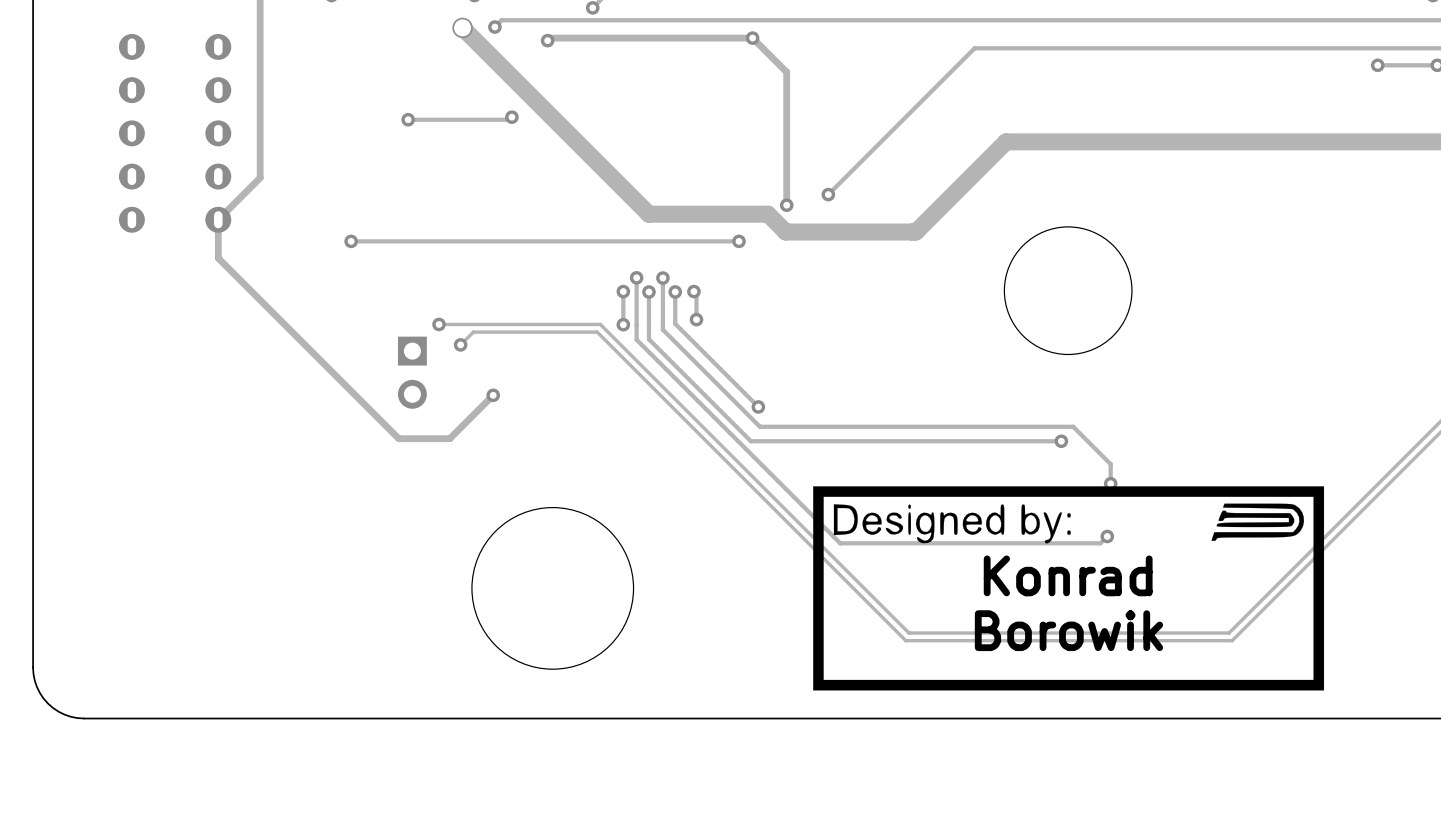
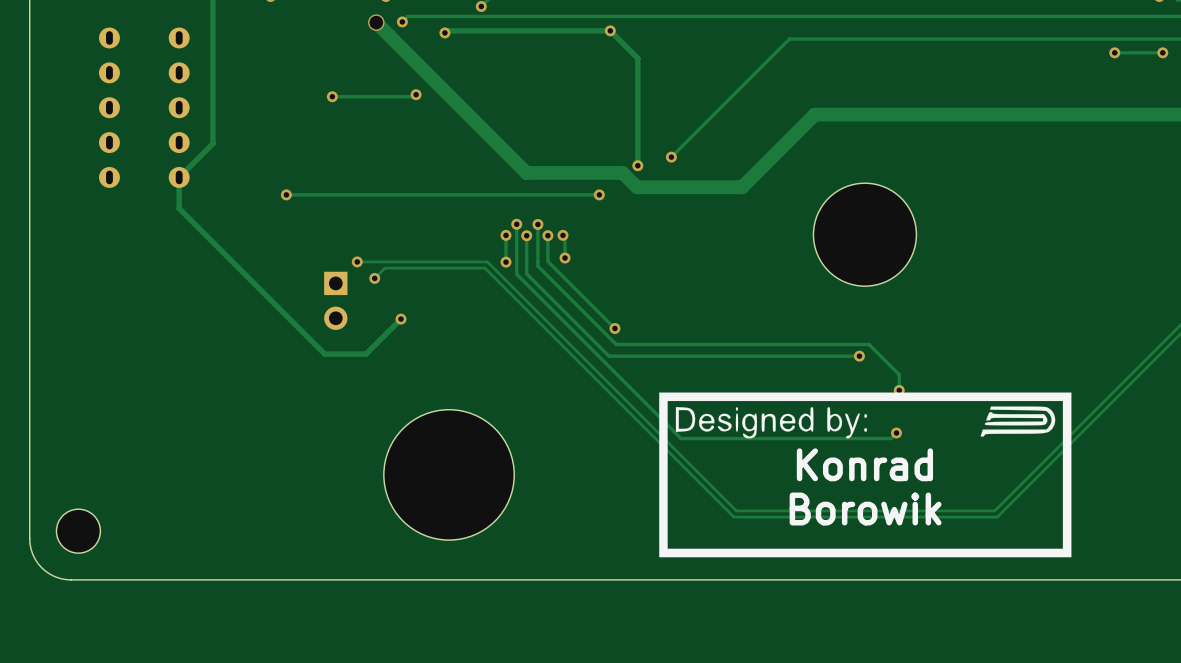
part: none -> (78, 531)

